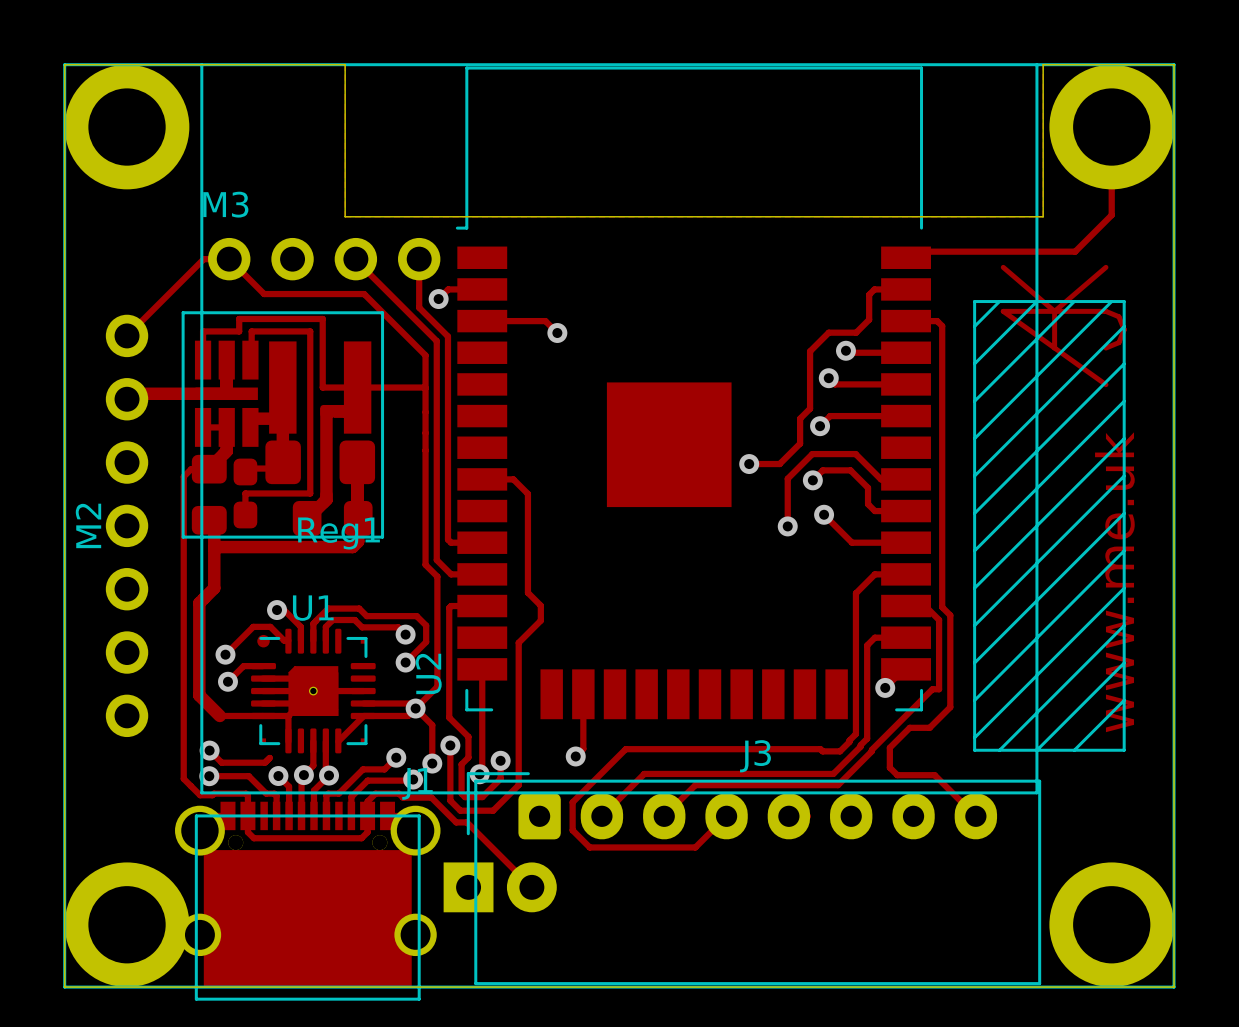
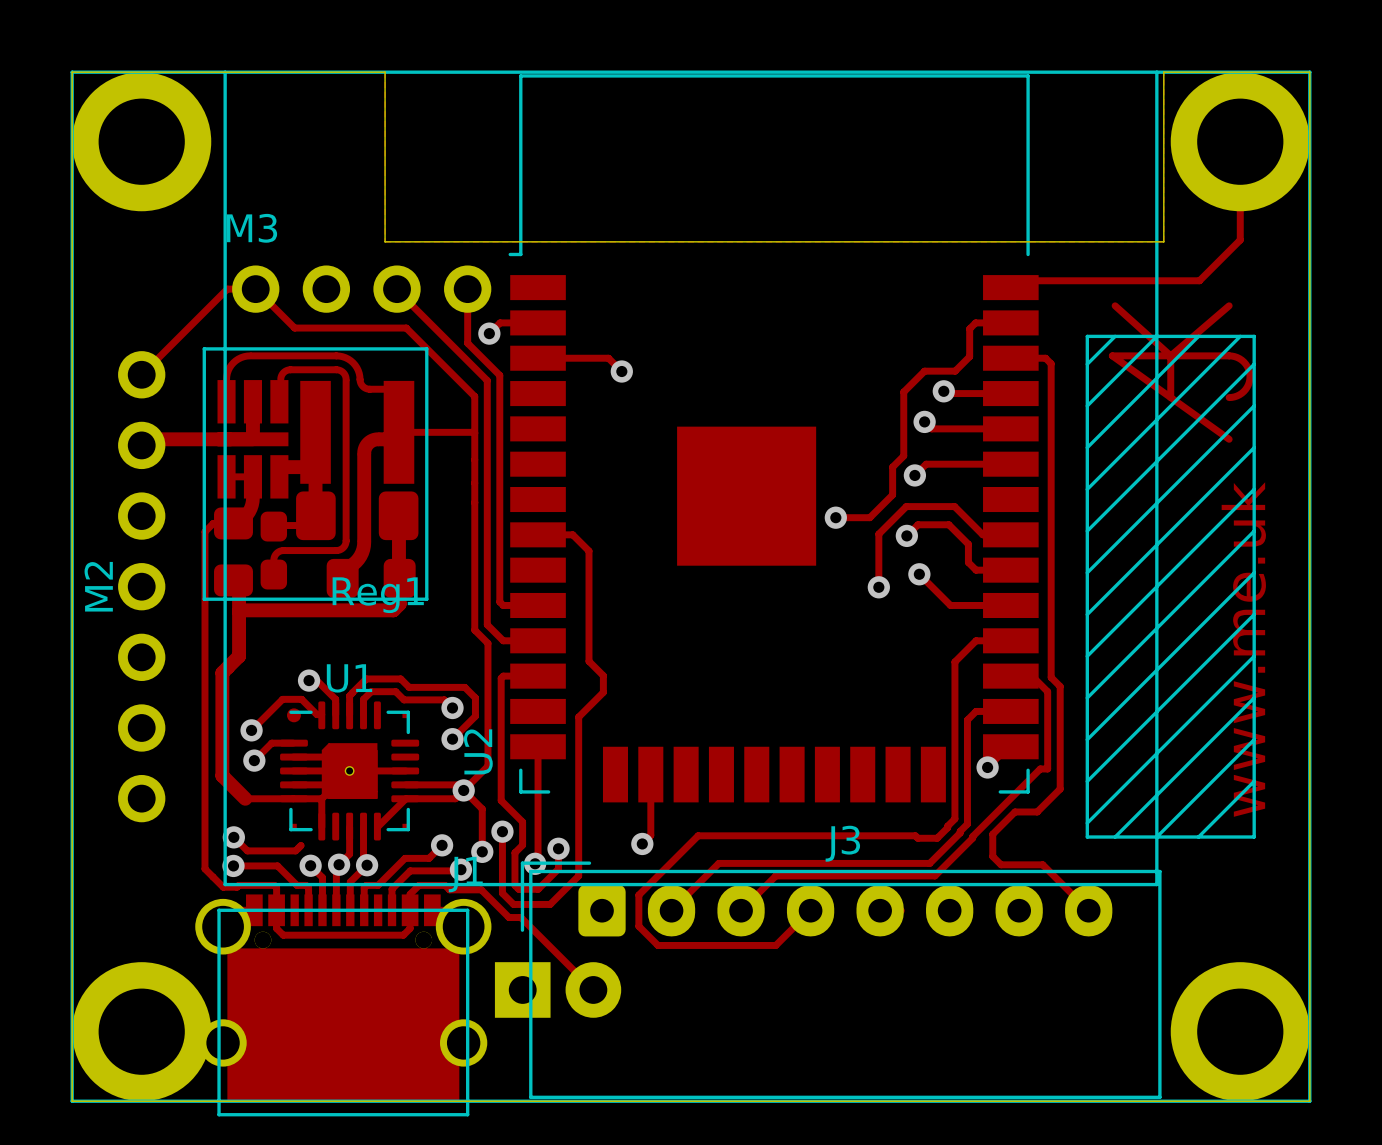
drawing shape: [1000, 264, 1127, 388] -> [1108, 302, 1254, 443]
Reg1 footprint: [181, 311, 385, 539] -> [202, 347, 429, 601]

